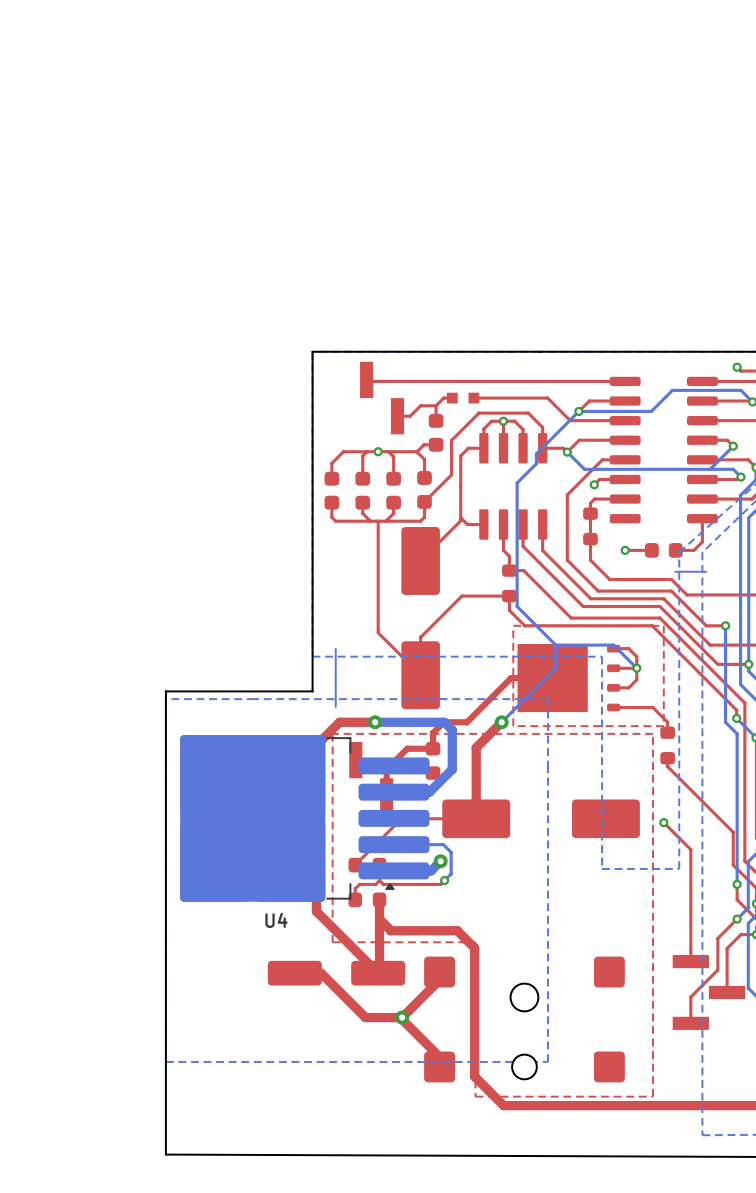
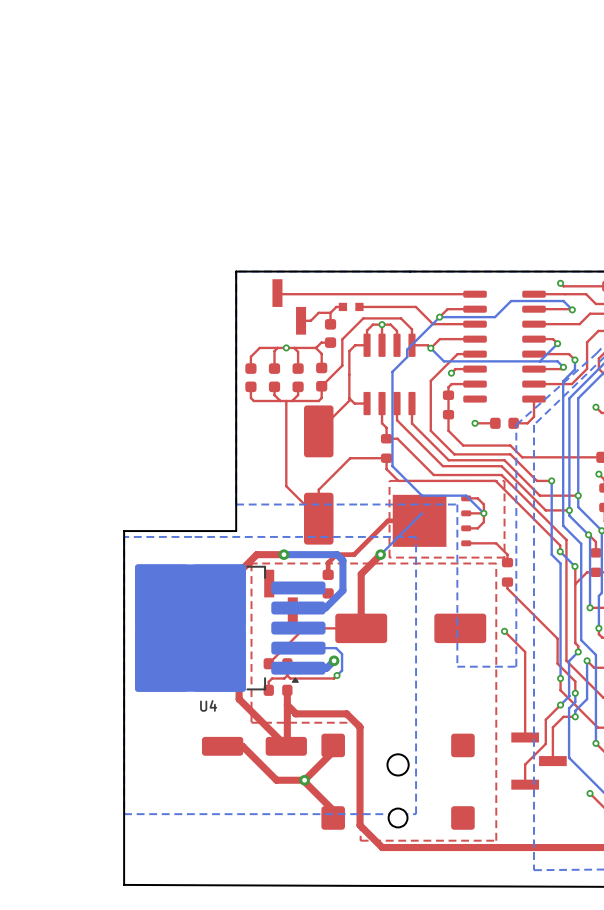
bottom track: (706, 571) (675, 571) -> none
bottom track: (555, 645) (555, 668) -> none
bottom track: (335, 648) (335, 706) -> none
top track: (432, 748) (407, 748) (386, 769) (386, 796) -> none

